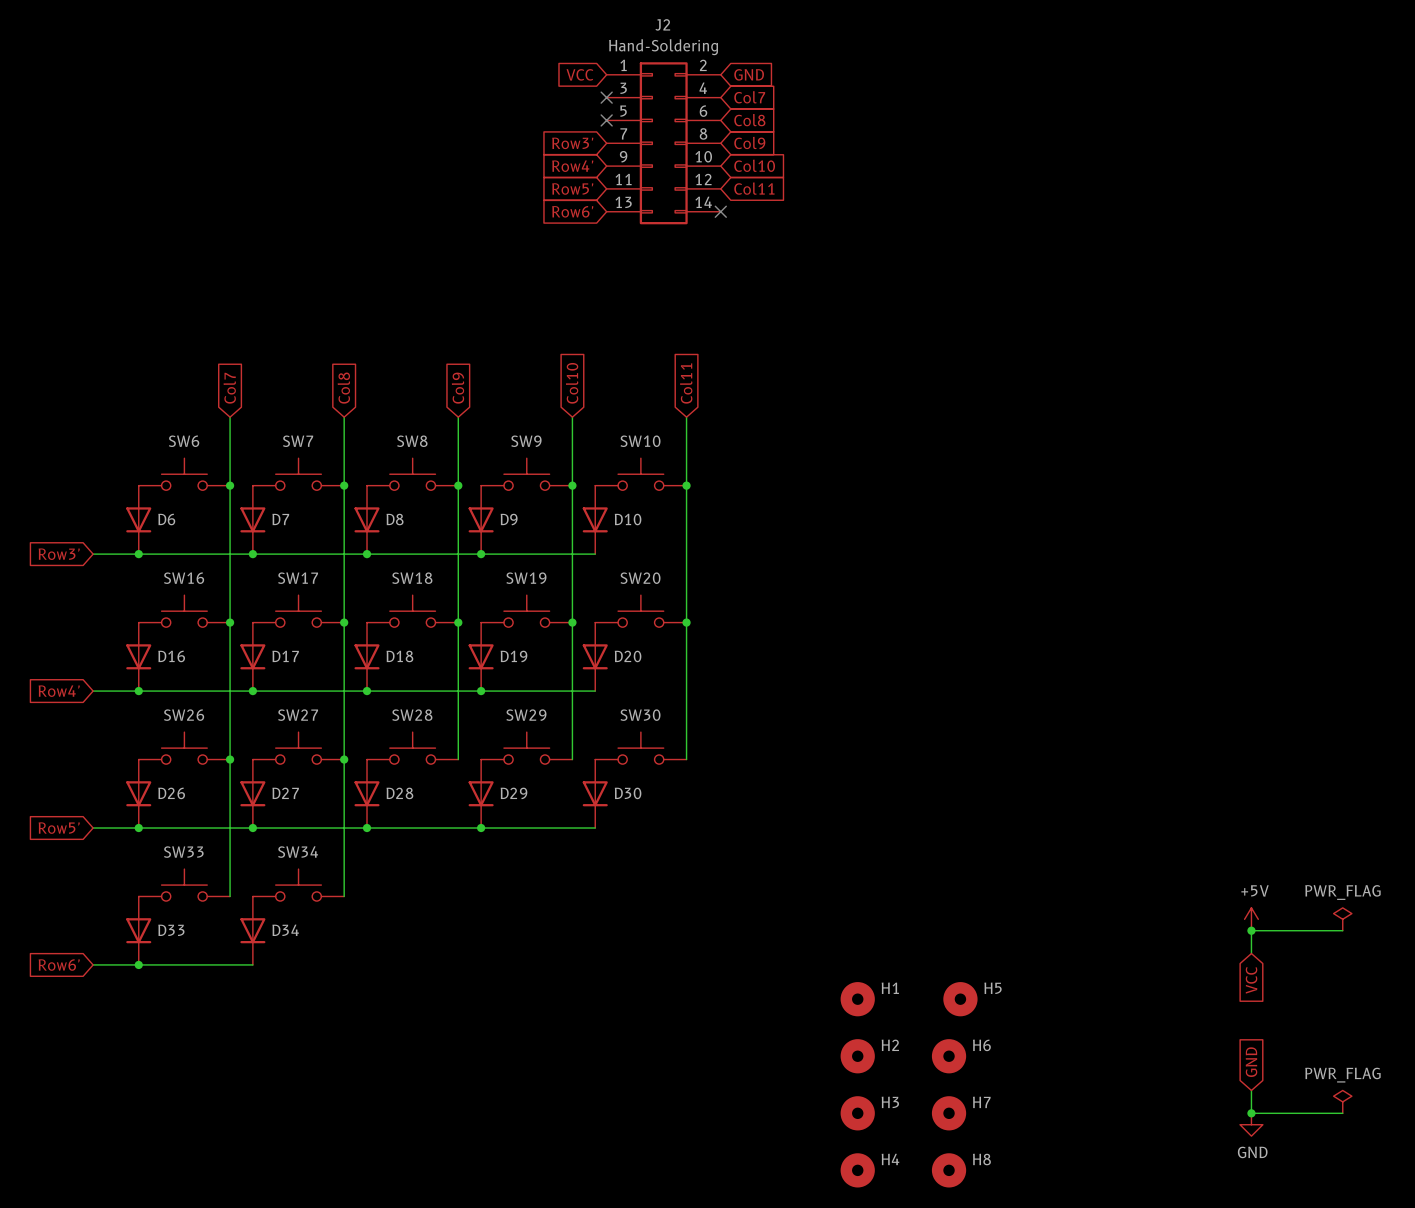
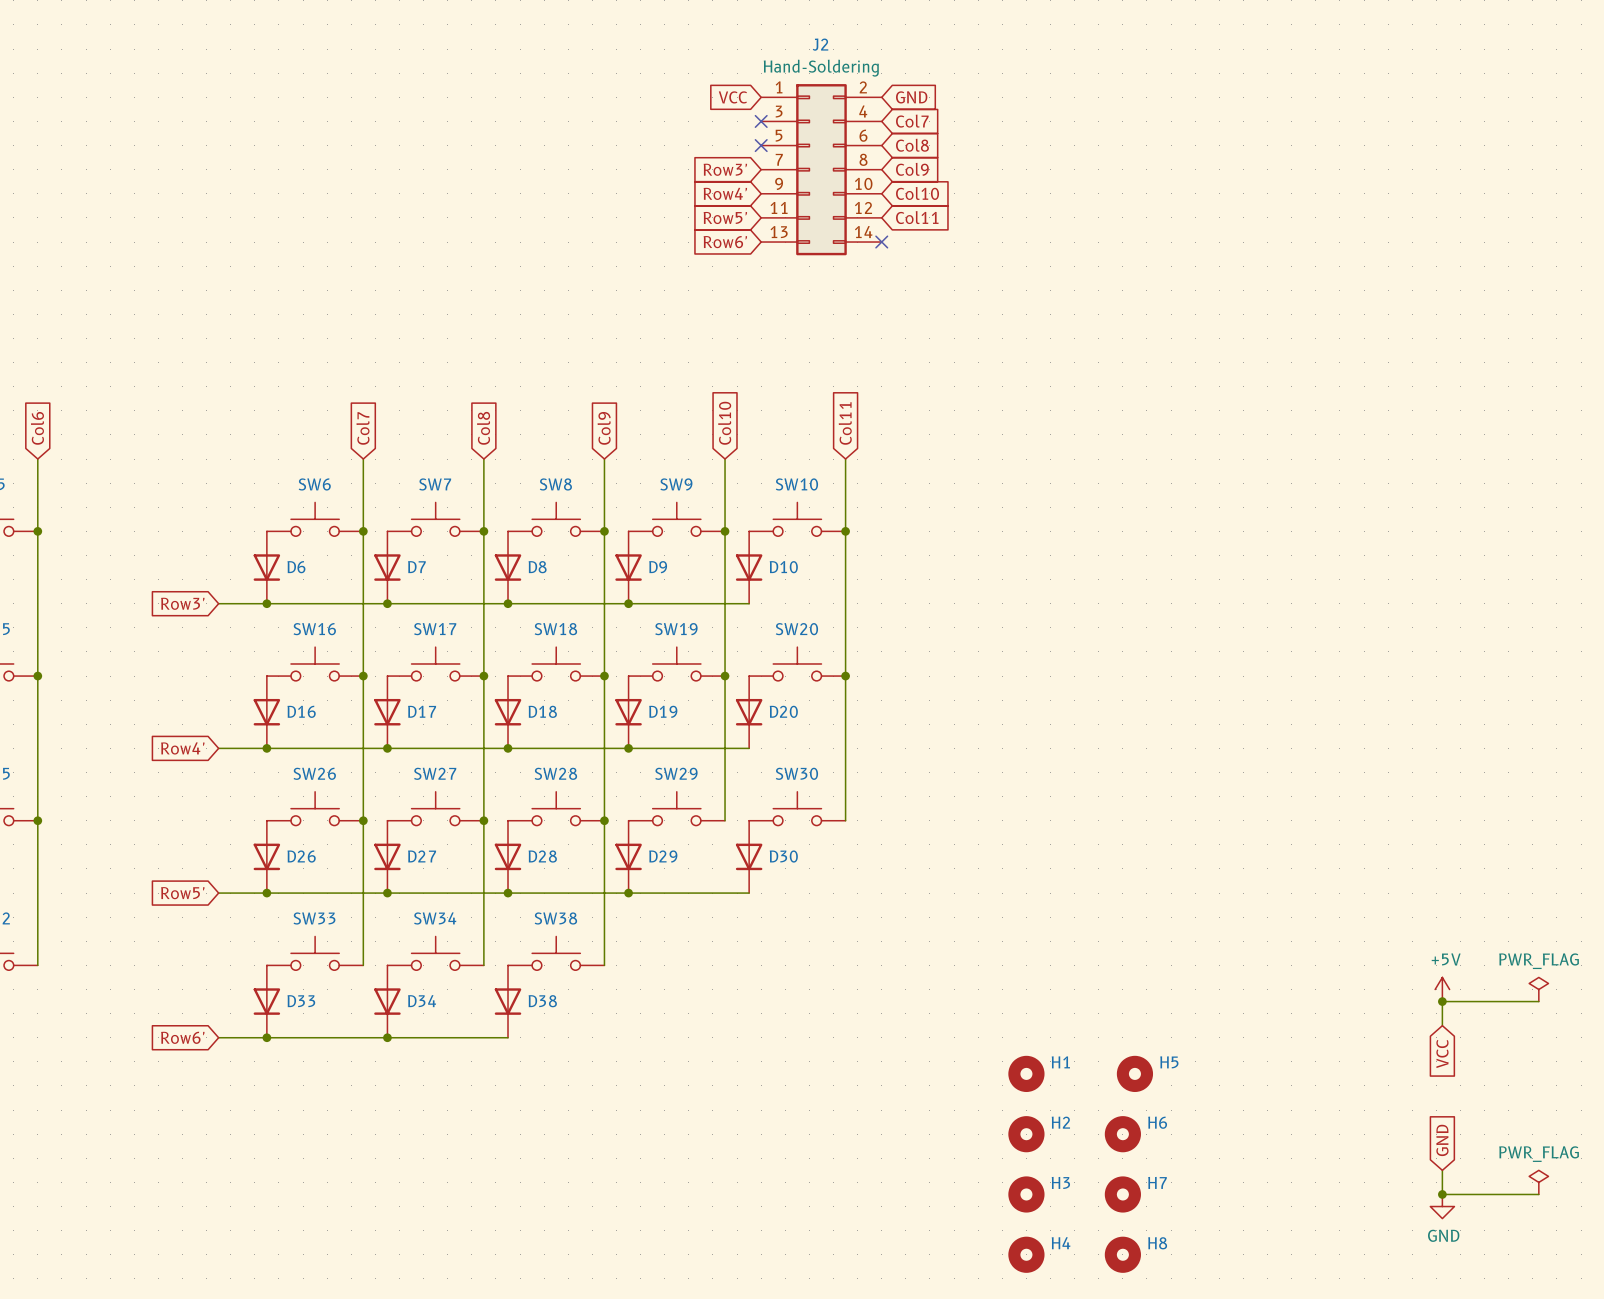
wire: none -> (604, 820) (604, 965)
junction: none -> (604, 820)
SW38: none -> (556, 953)
D38: none -> (508, 1001)
wire: none -> (387, 1037) (508, 1037)
junction: none -> (387, 1037)

